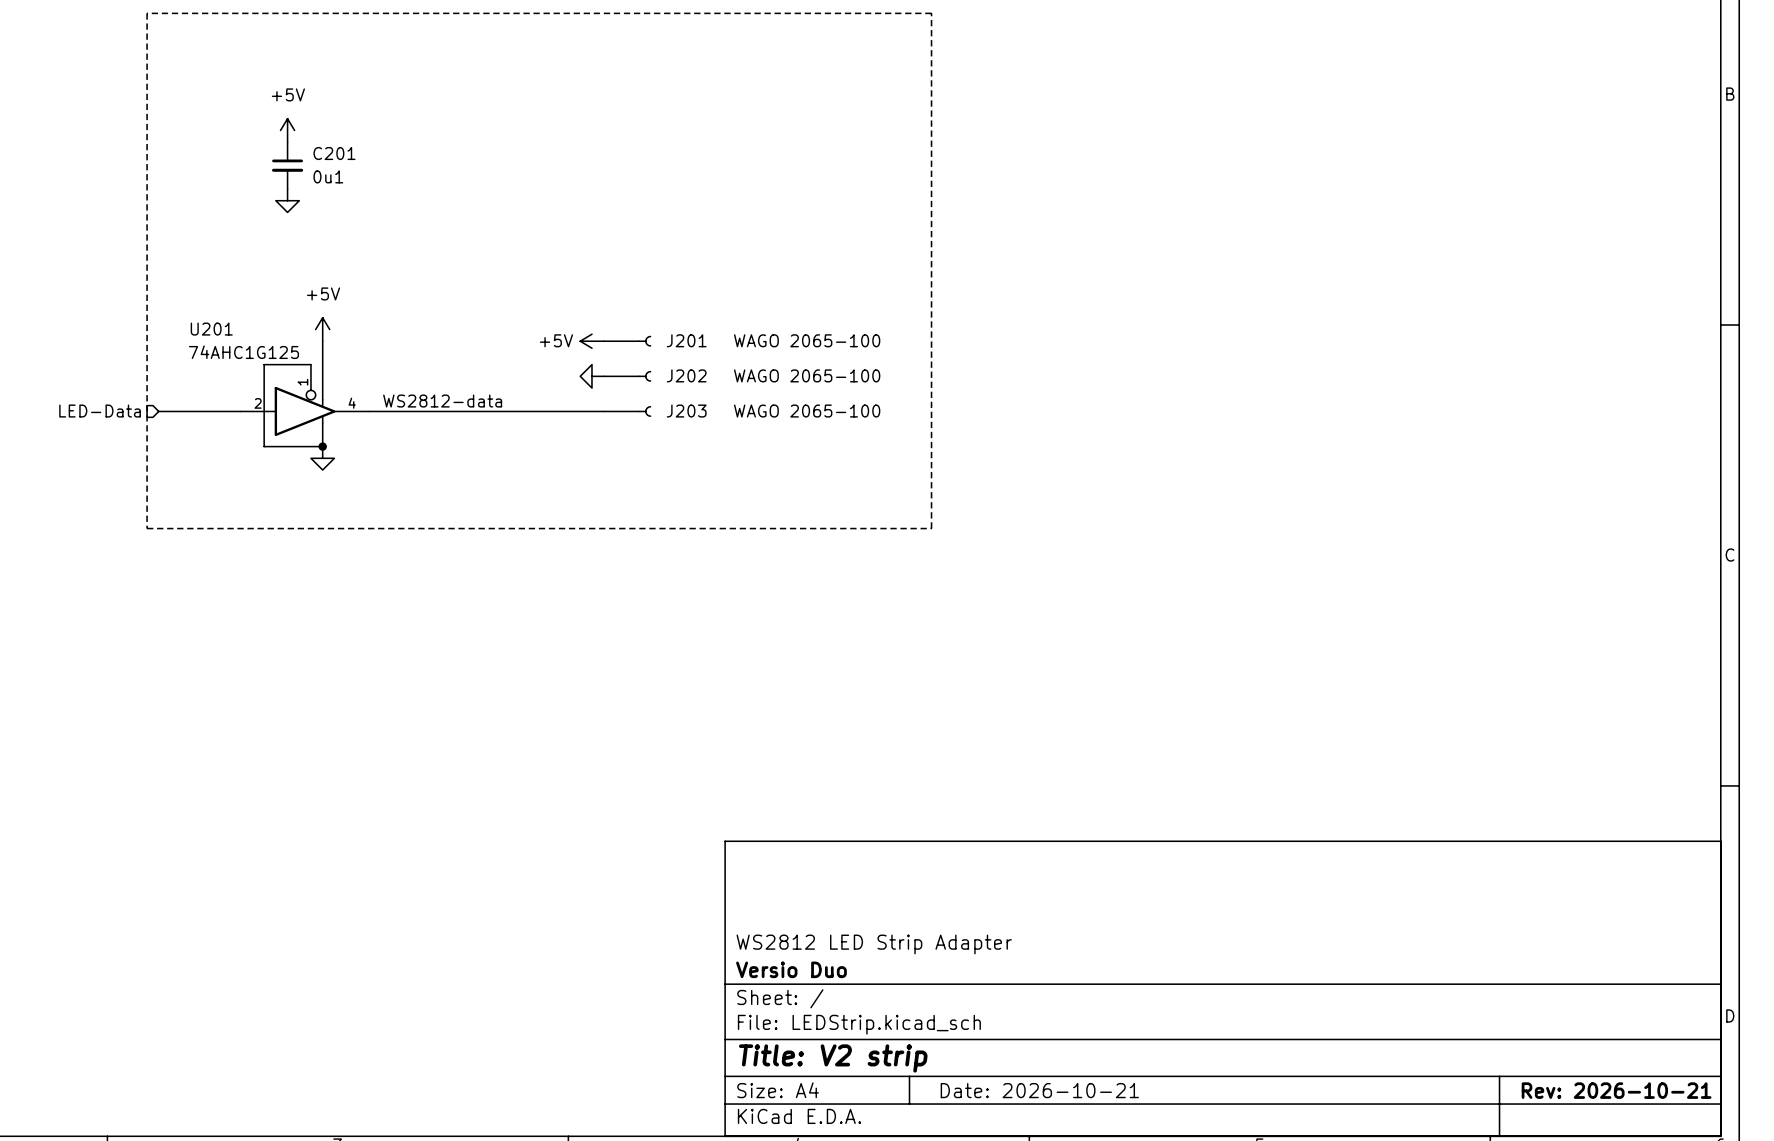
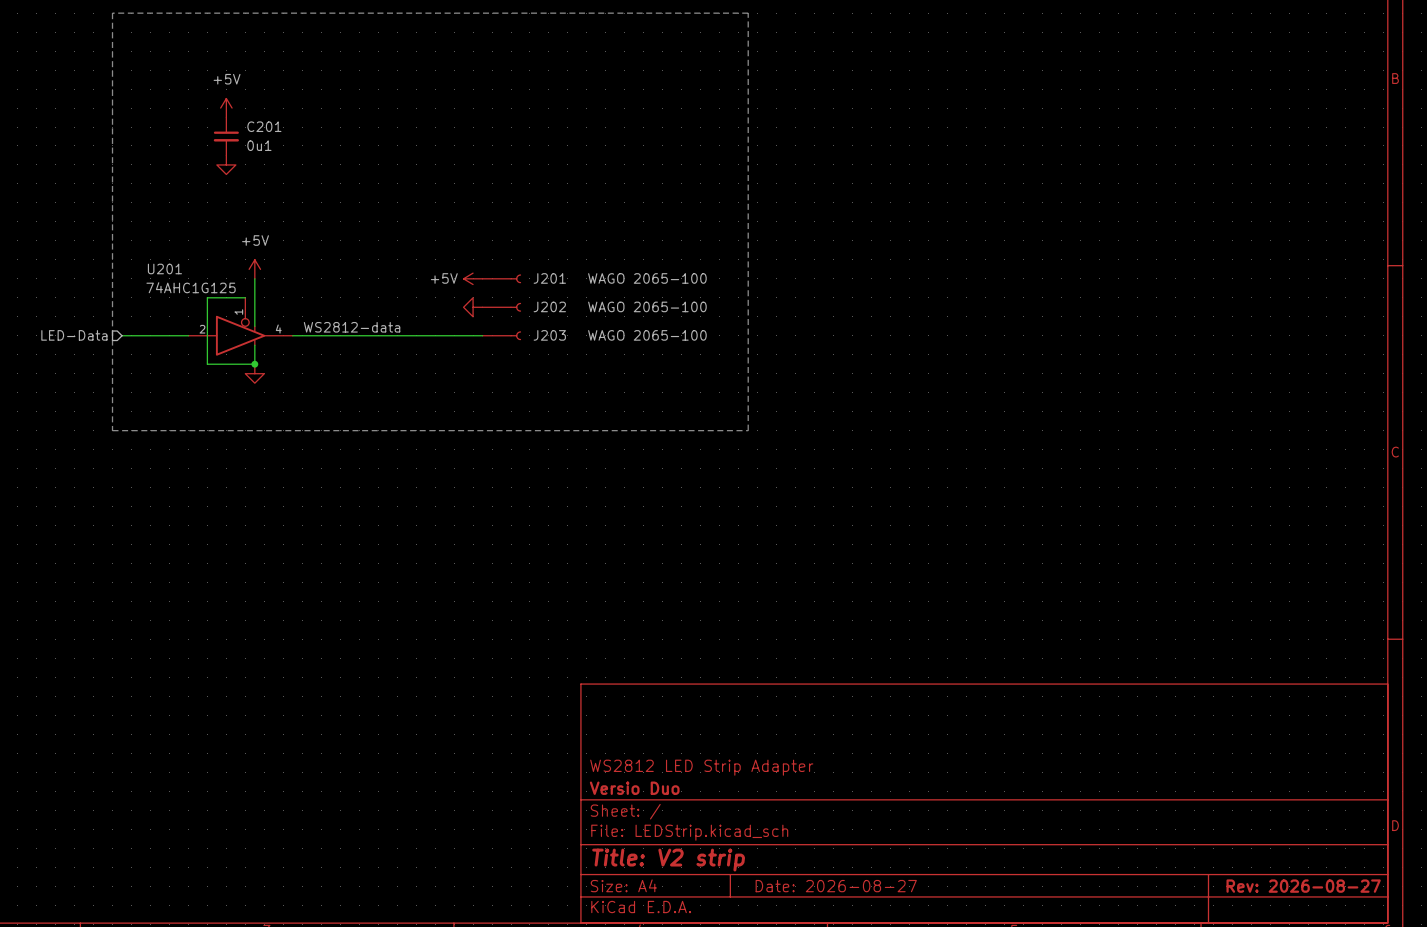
title block: Date: 2026-10-21 (1039, 1090) -> Date: 2026-08-27 (836, 886)
title block: Rev: 2026-10-21 (1616, 1090) -> Rev: 2026-08-27 (1303, 886)

